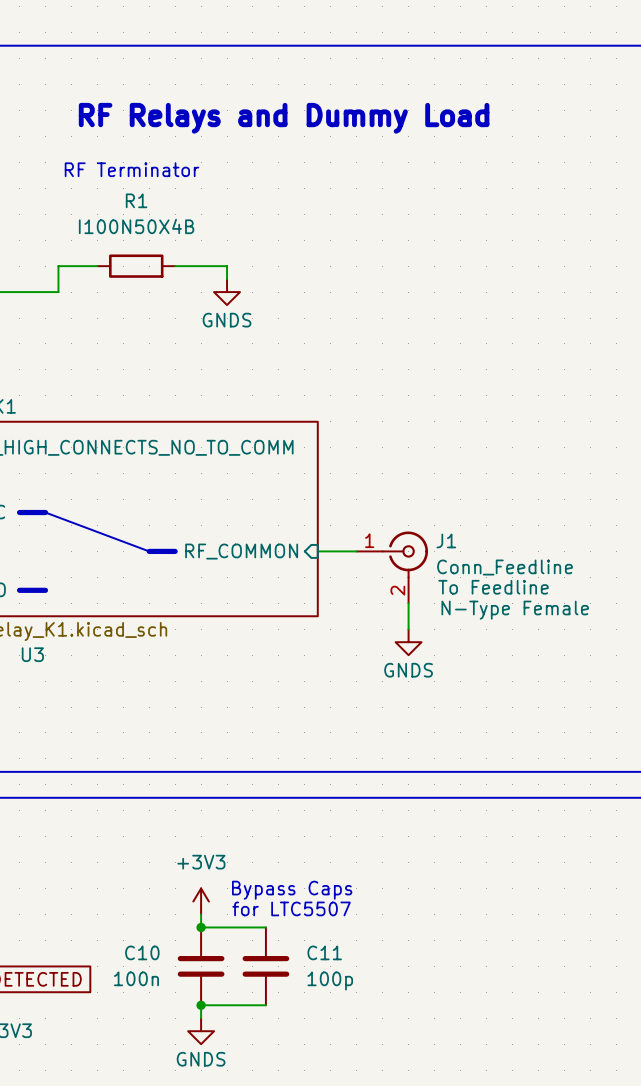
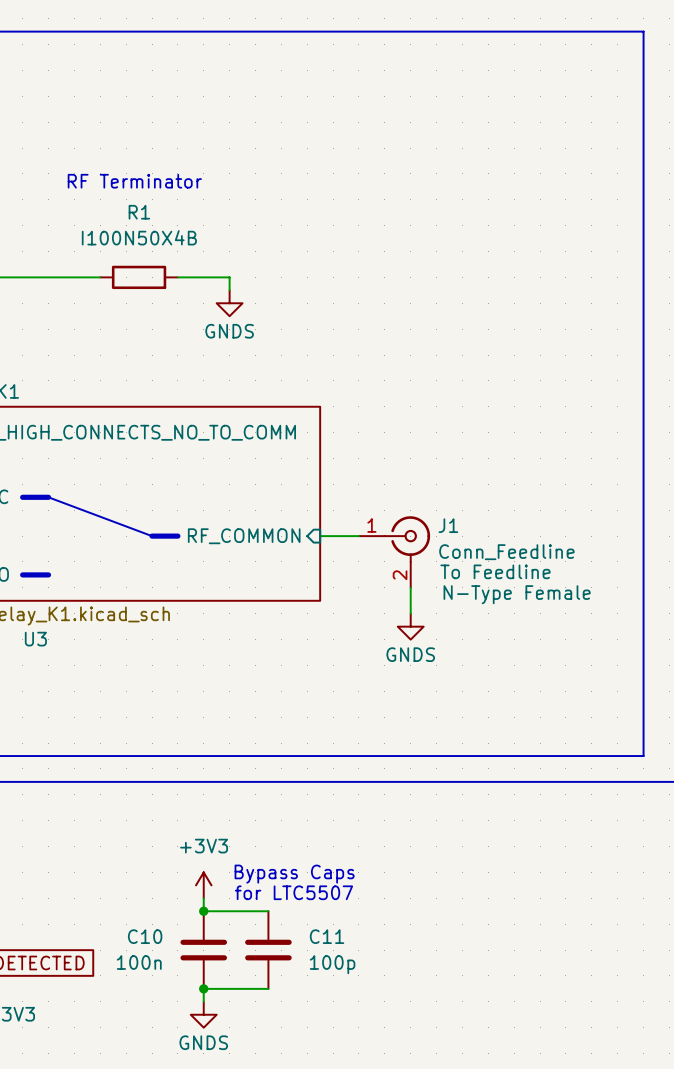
text: RF Relays and Dummy Load (284, 118) -> none
text position: RF Terminator (132, 169) -> RF Terminator (134, 181)
wire: (97, 266) (58, 266) (58, 292) -> (100, 277) (61, 277)
R1 position: (136, 266) -> (139, 277)
wire: (175, 266) (227, 266) (227, 279) -> (177, 277) (229, 277) (229, 290)
power symbol position: GNDS (227, 292) -> GNDS (229, 303)

